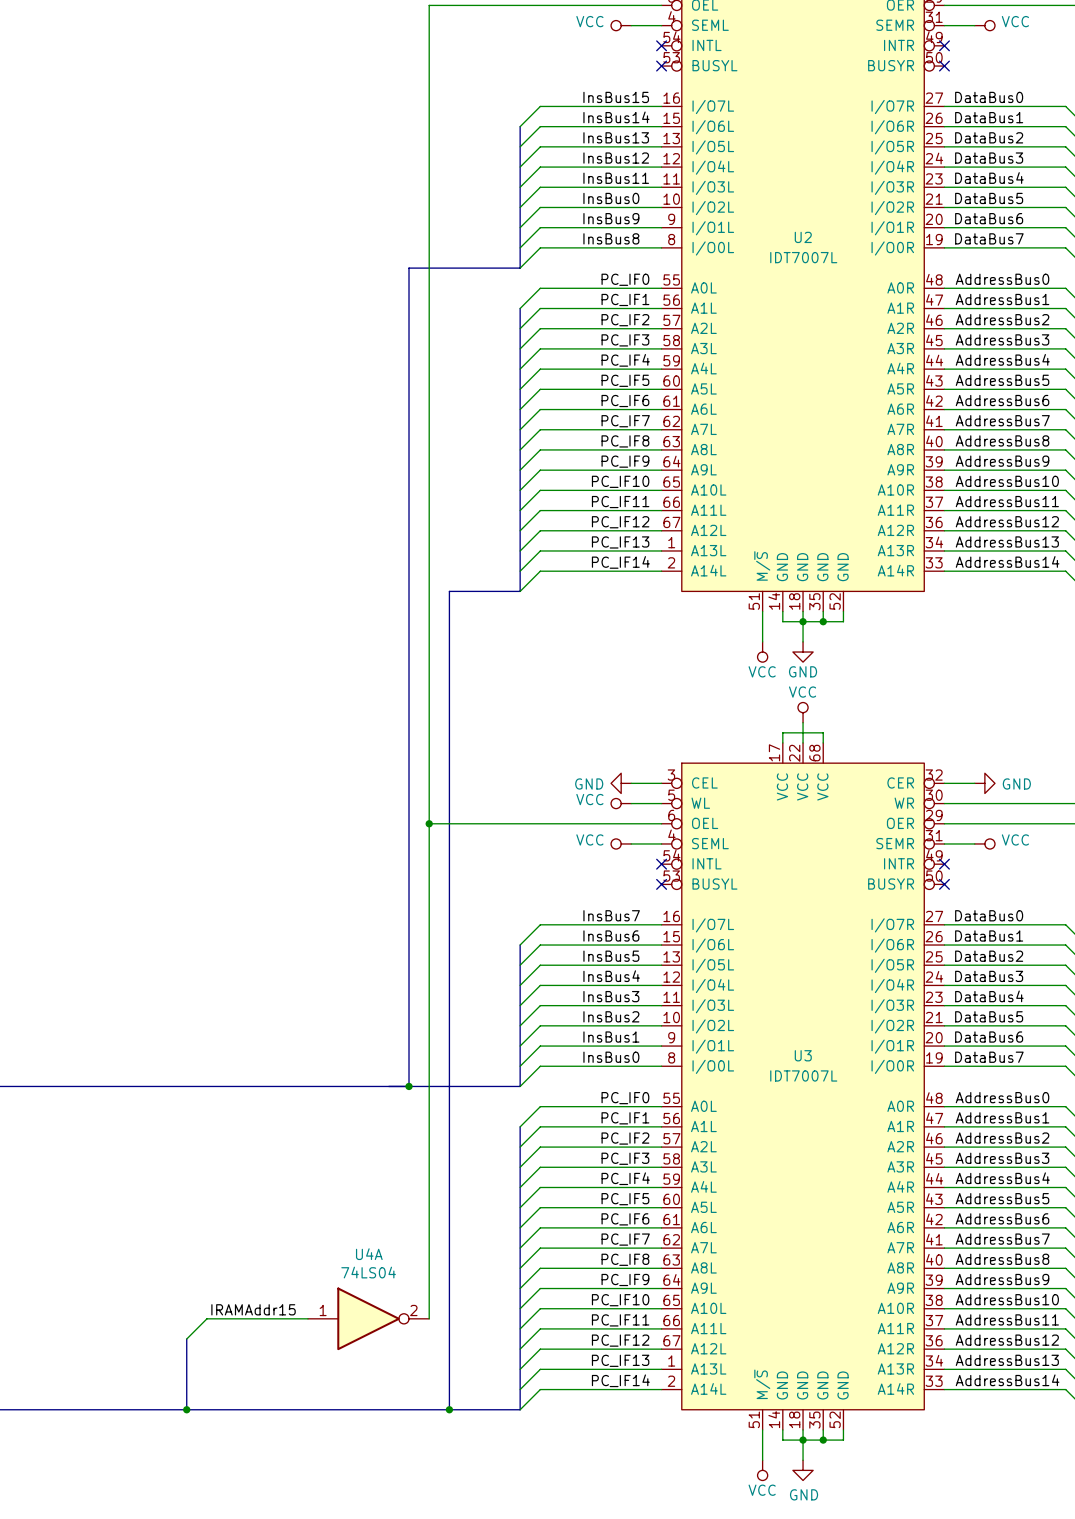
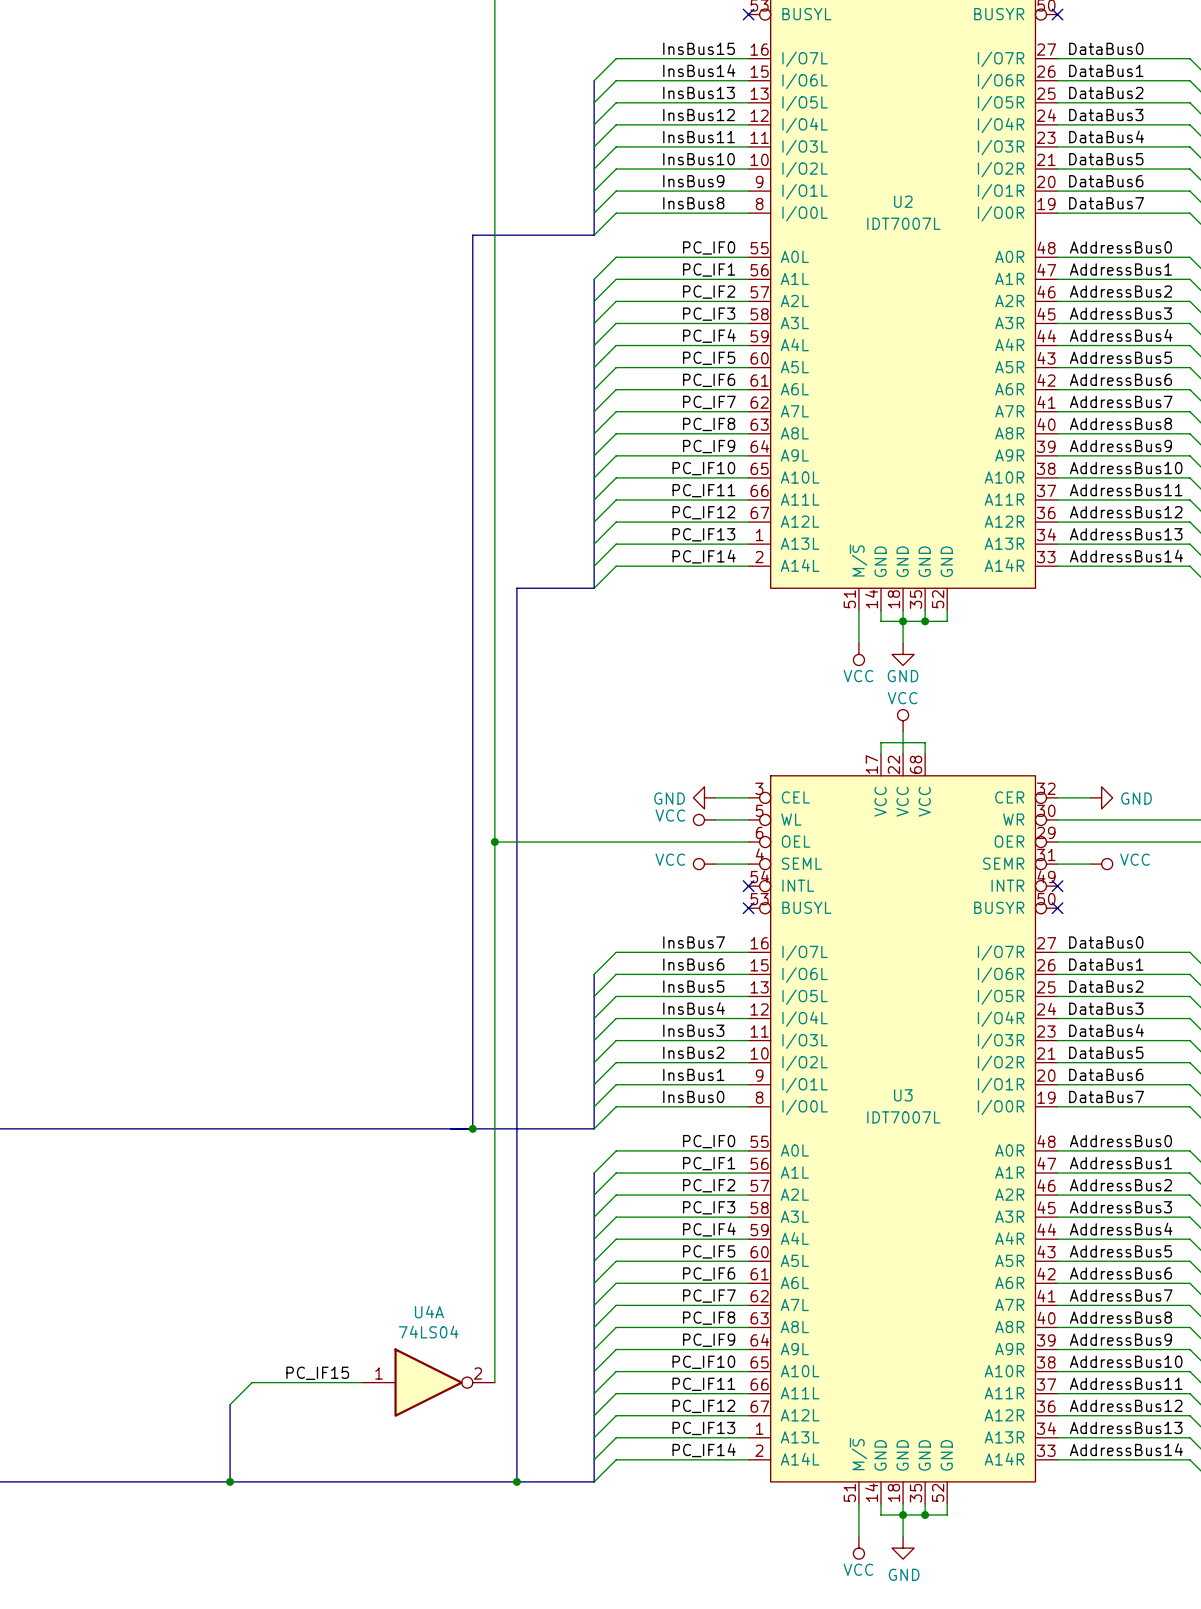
label: InsBus0 (611, 198) -> InsBus10 (699, 159)
label: IRAMAddr15 (253, 1309) -> PC_IF15 (317, 1373)

